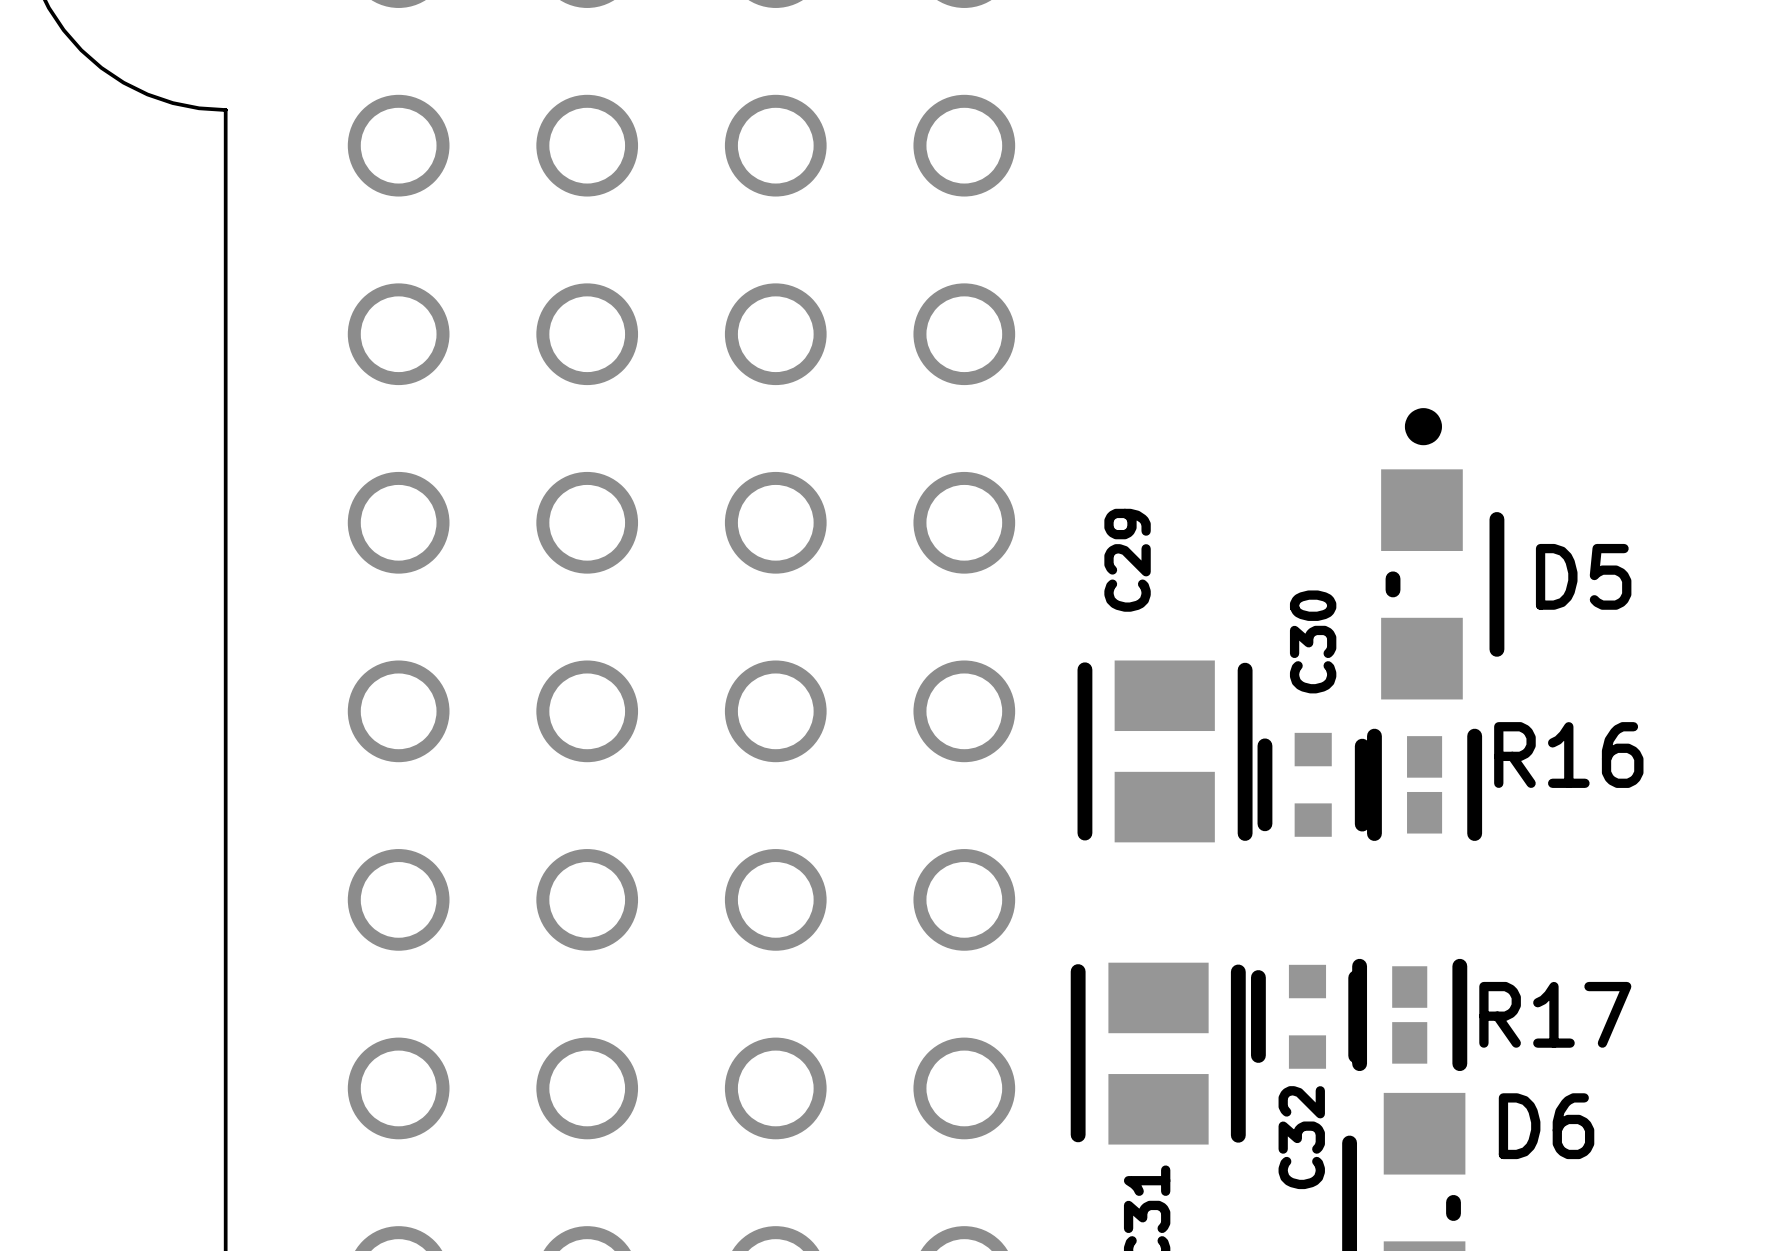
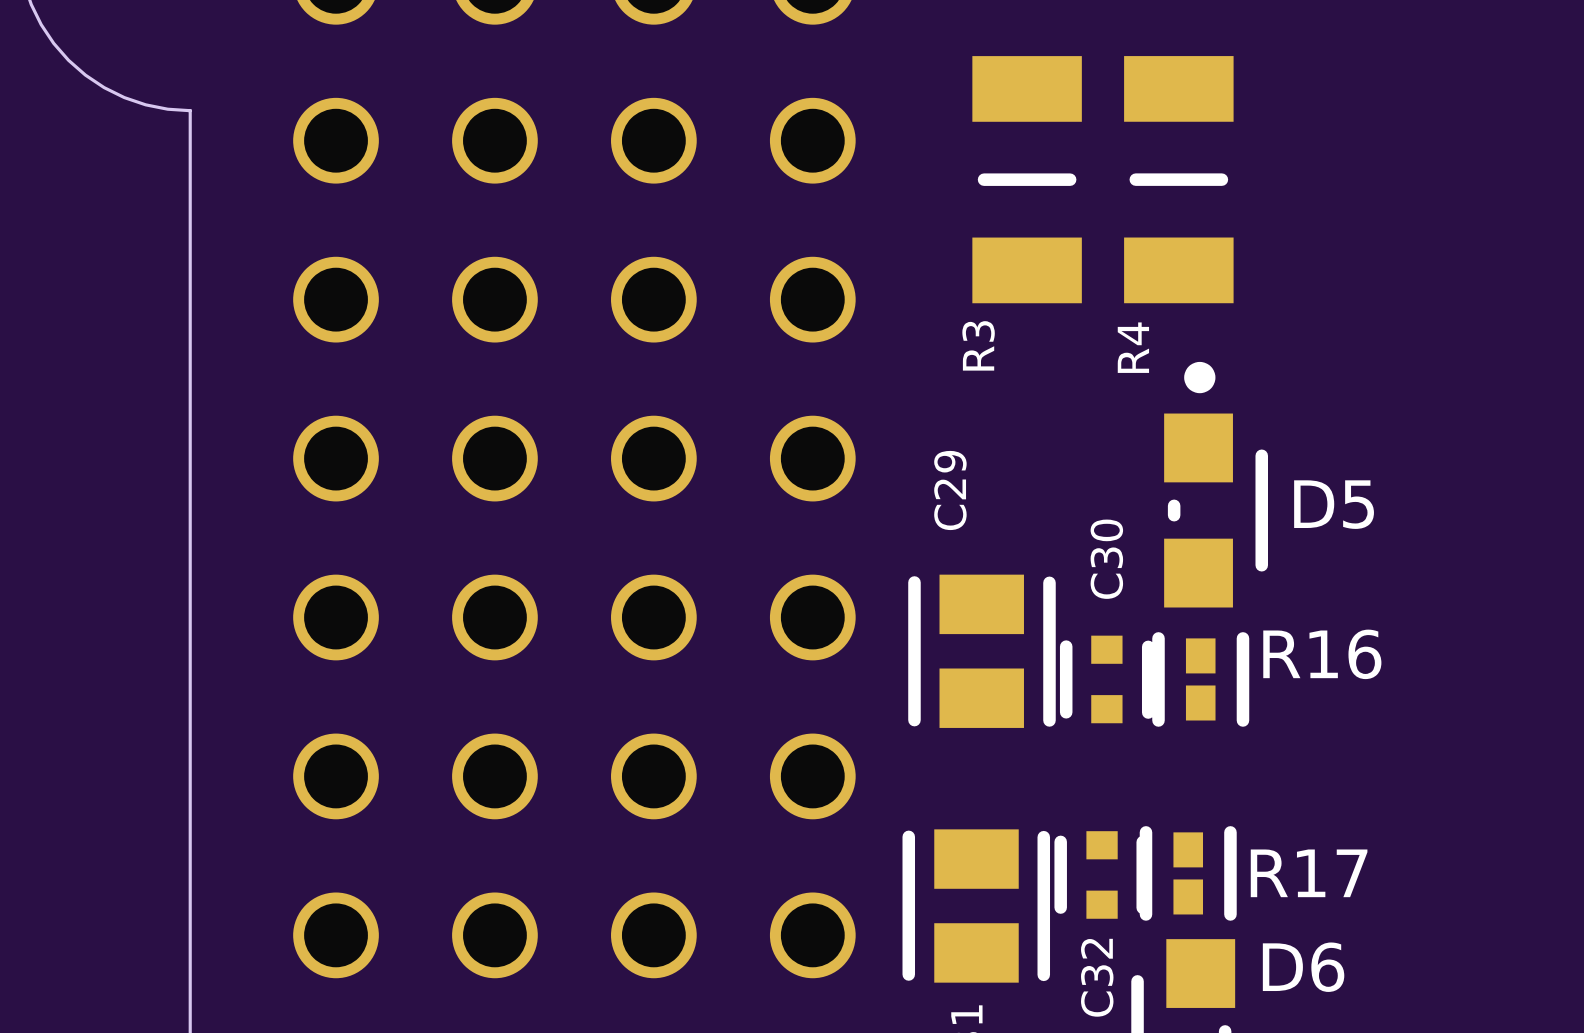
R3: none -> (1027, 179)
R4: none -> (1178, 179)

